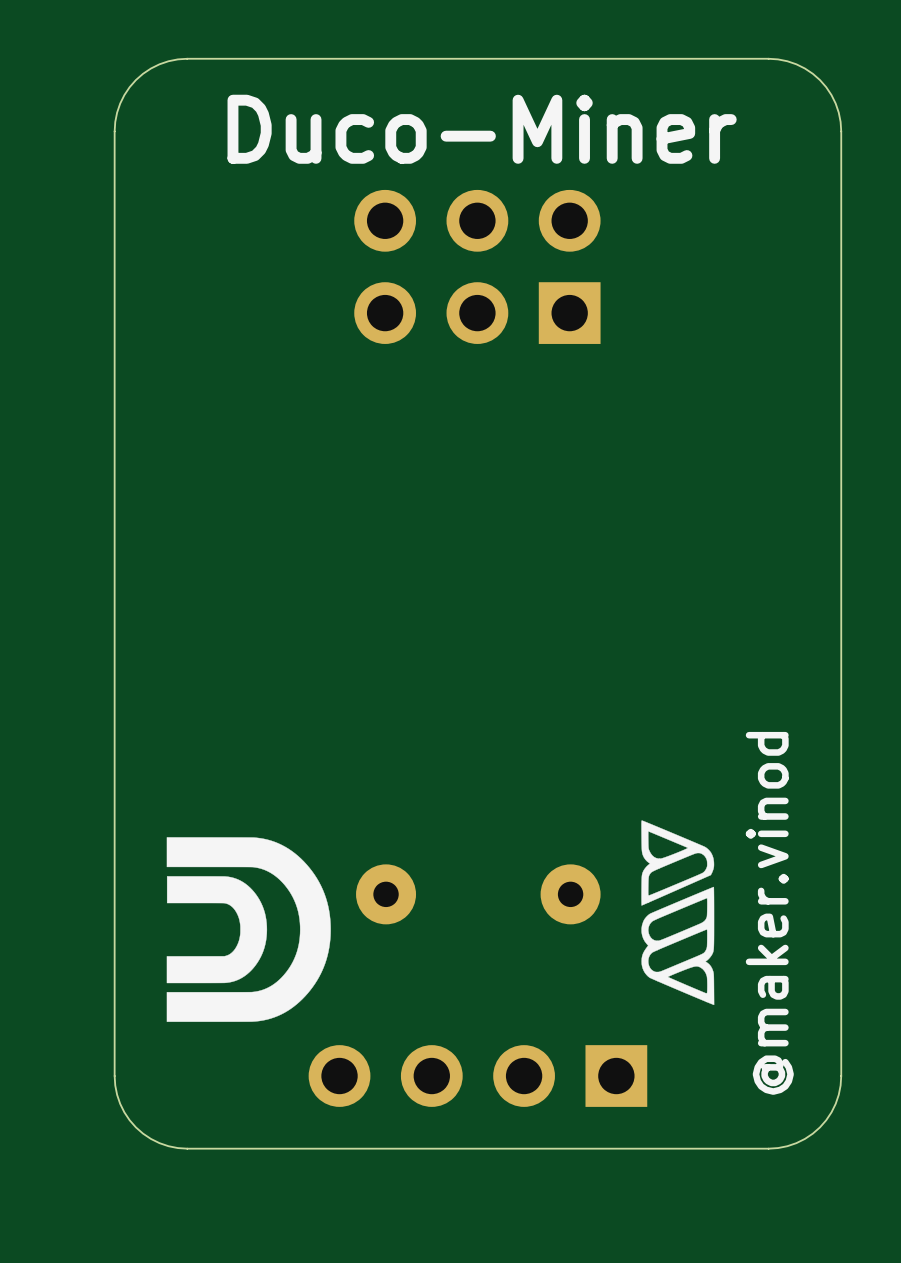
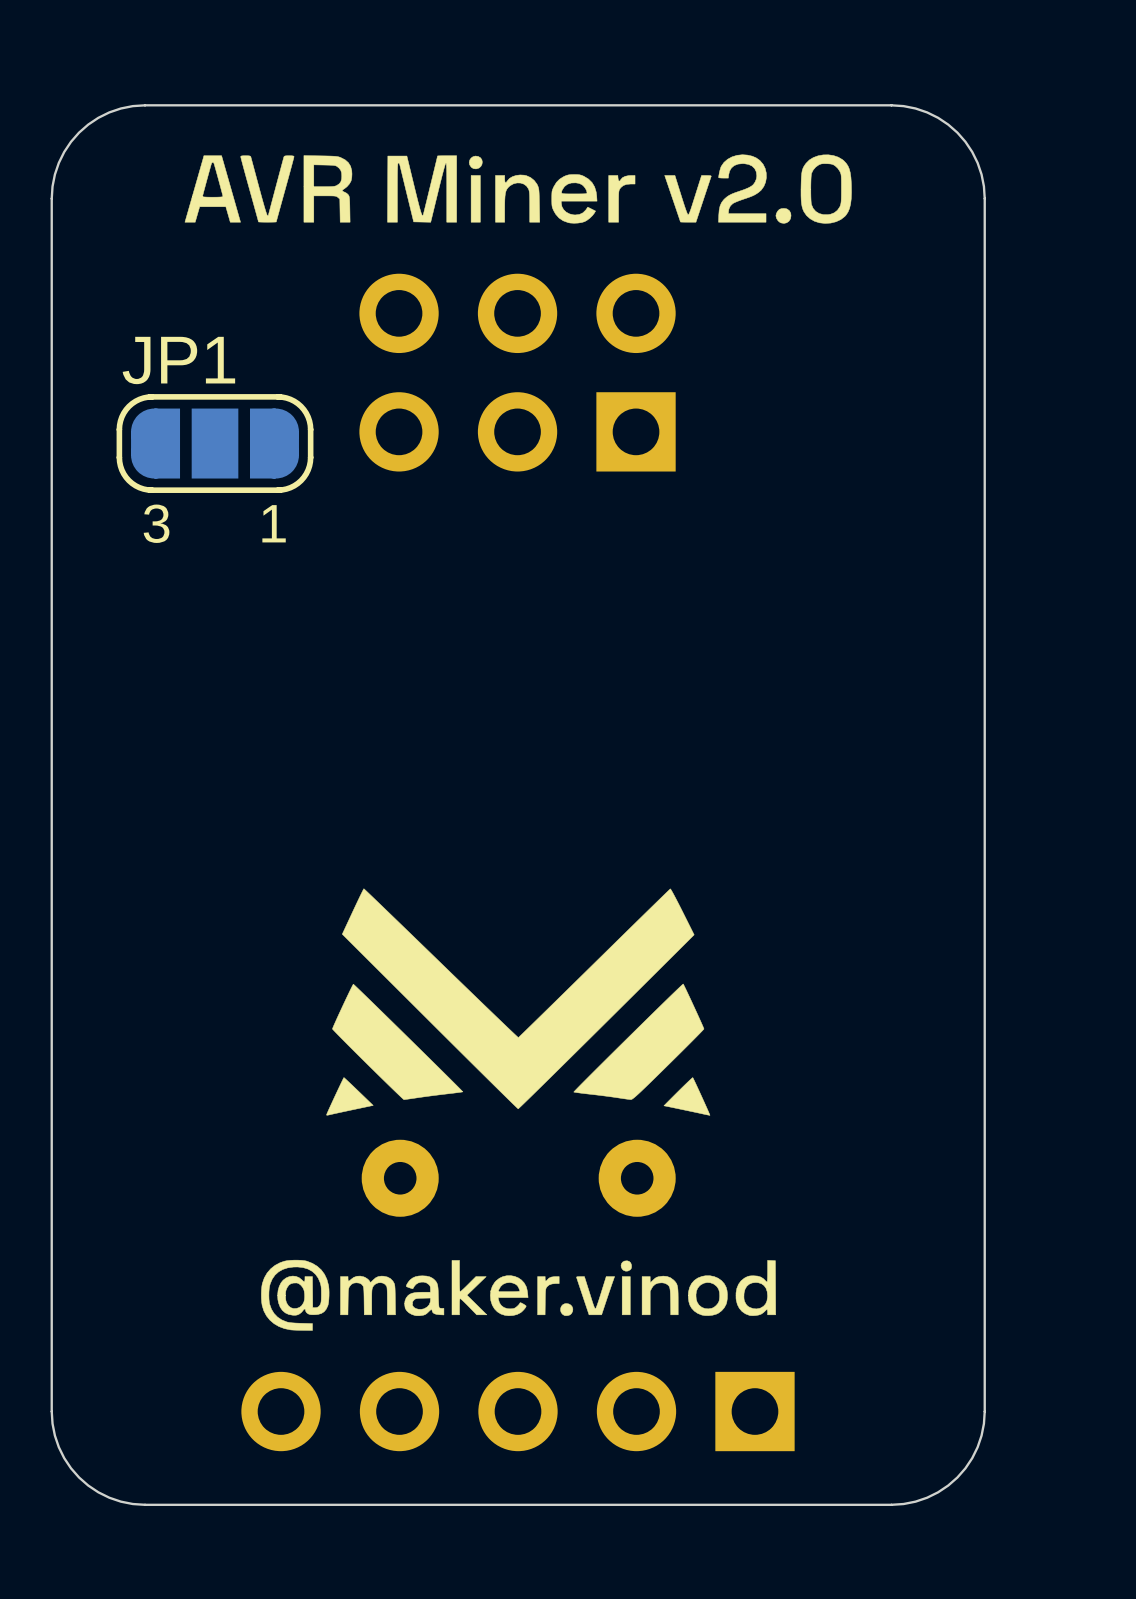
drawing: none -> [184, 154, 852, 224]
text: Duco-Miner (482, 129) -> none
JP1: none -> (215, 443)
drawing: none -> [326, 888, 711, 1116]
drawing: [641, 820, 715, 1006] -> none
drawing: [166, 837, 331, 1022] -> none
text: @maker.vinod (769, 913) -> none
drawing: none -> [261, 1259, 776, 1331]
part footprint: [308, 1045, 648, 1107] -> [241, 1371, 795, 1452]

